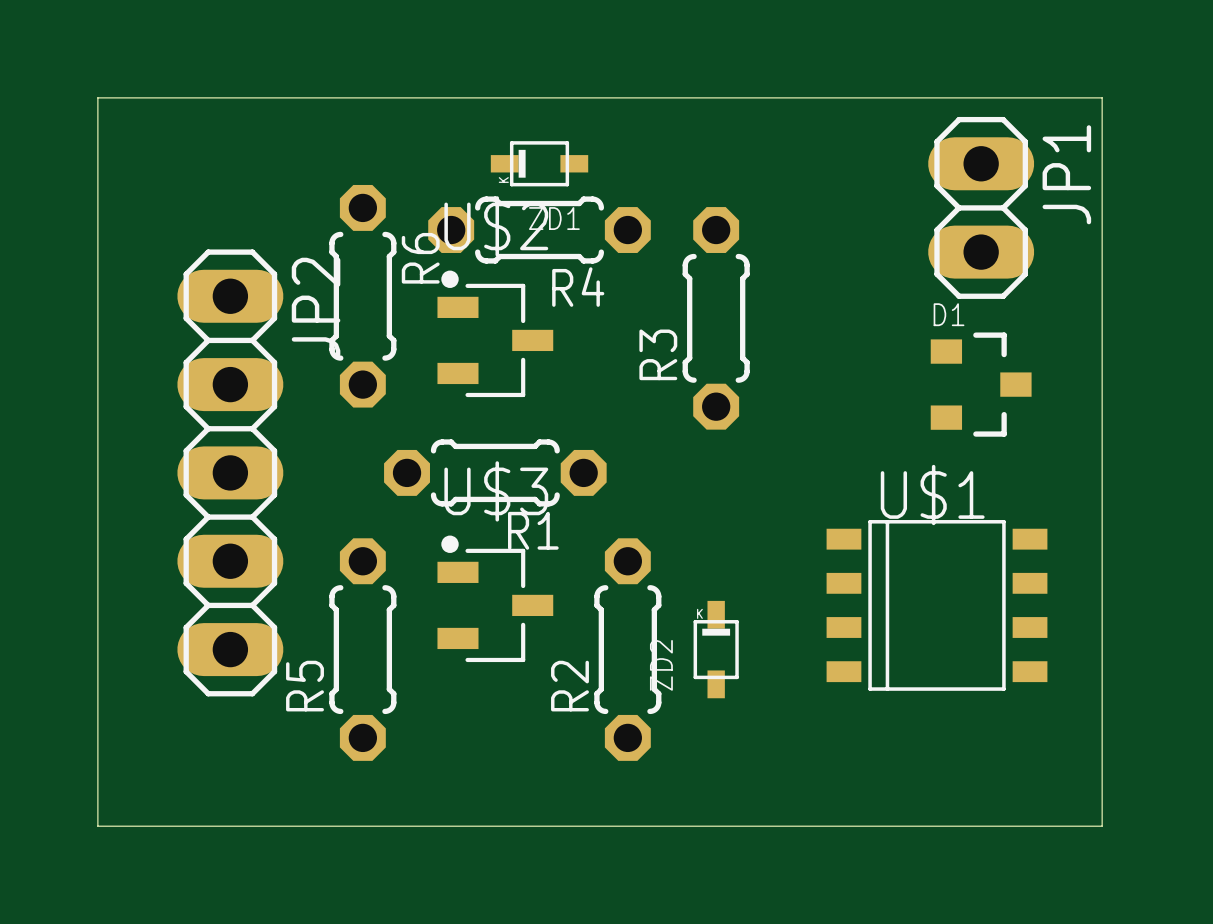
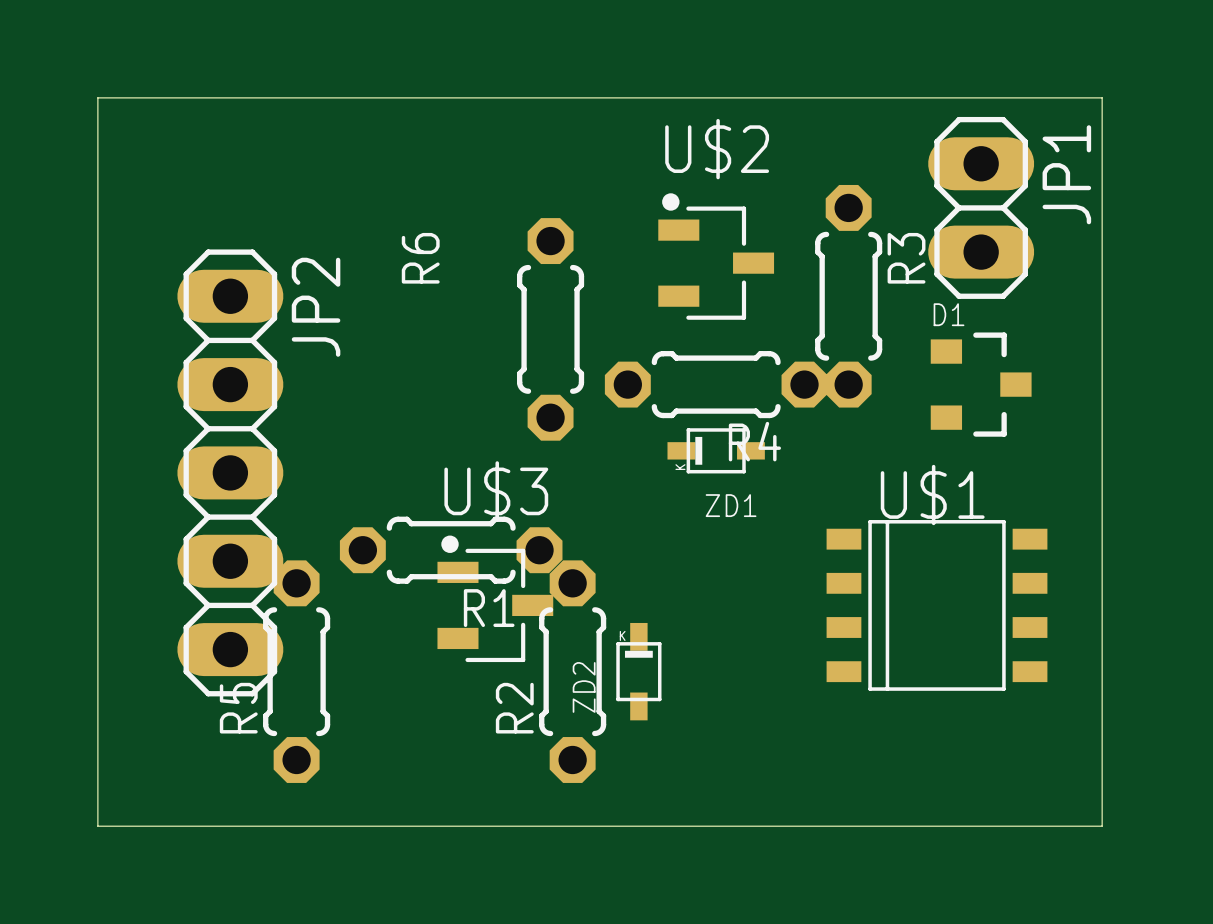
ZD1 position: (539, 163) -> (716, 450)
R4 position: (539, 230) -> (716, 384)
R6 position: (362, 296) -> (550, 329)
R3 position: (716, 318) -> (848, 296)
U$2 position: (495, 333) -> (716, 256)
R3 name position: R3 (658, 354) -> R3 (906, 258)
R1 position: (495, 472) -> (451, 550)
R5 position: (362, 649) -> (296, 671)
R2 position: (627, 649) -> (572, 671)
ZD2 position: (716, 649) -> (638, 671)

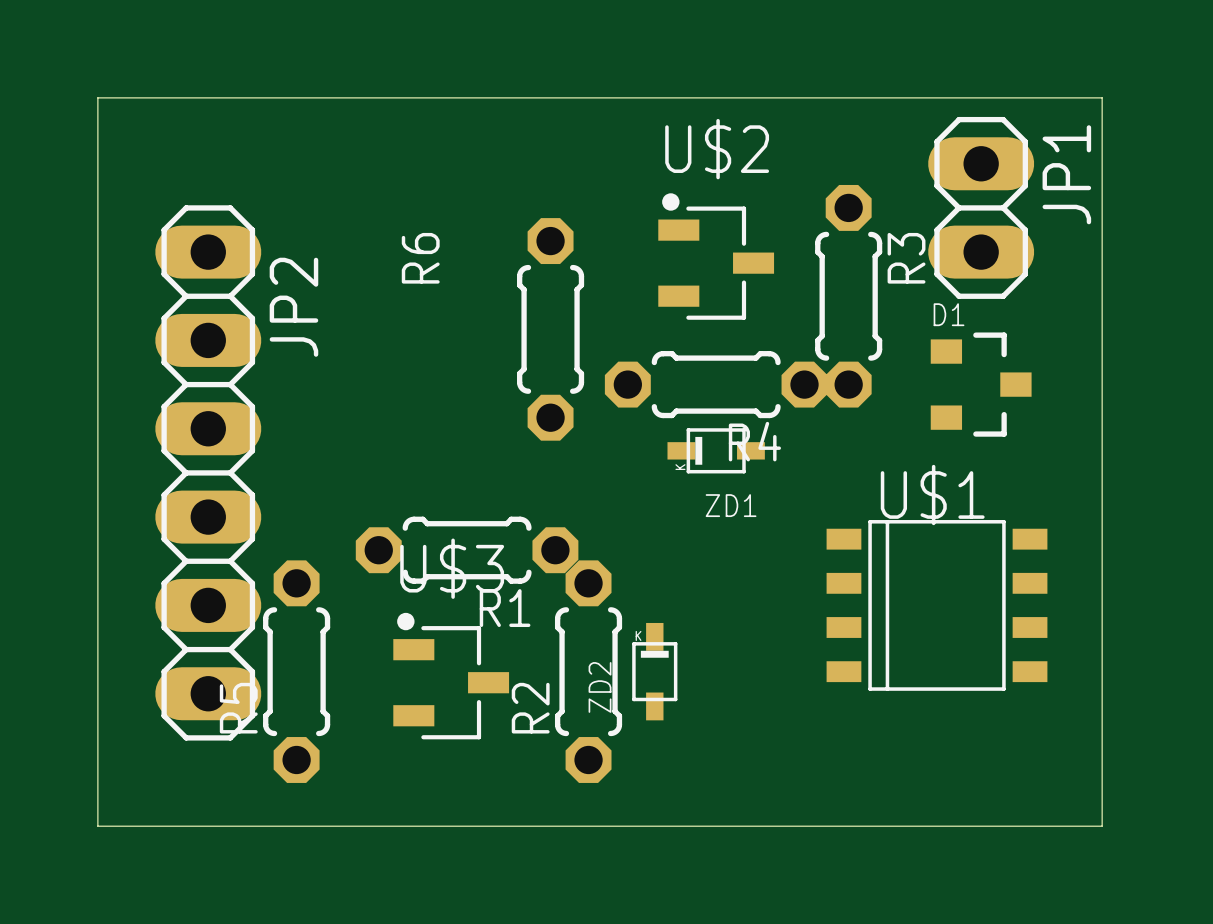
JP2 footprint: [177, 249, 284, 697] -> [155, 205, 262, 741]
R1 position: (451, 550) -> (467, 550)
U$3 position: (495, 598) -> (451, 676)
R2 position: (572, 671) -> (588, 671)
ZD2 position: (638, 671) -> (654, 671)

